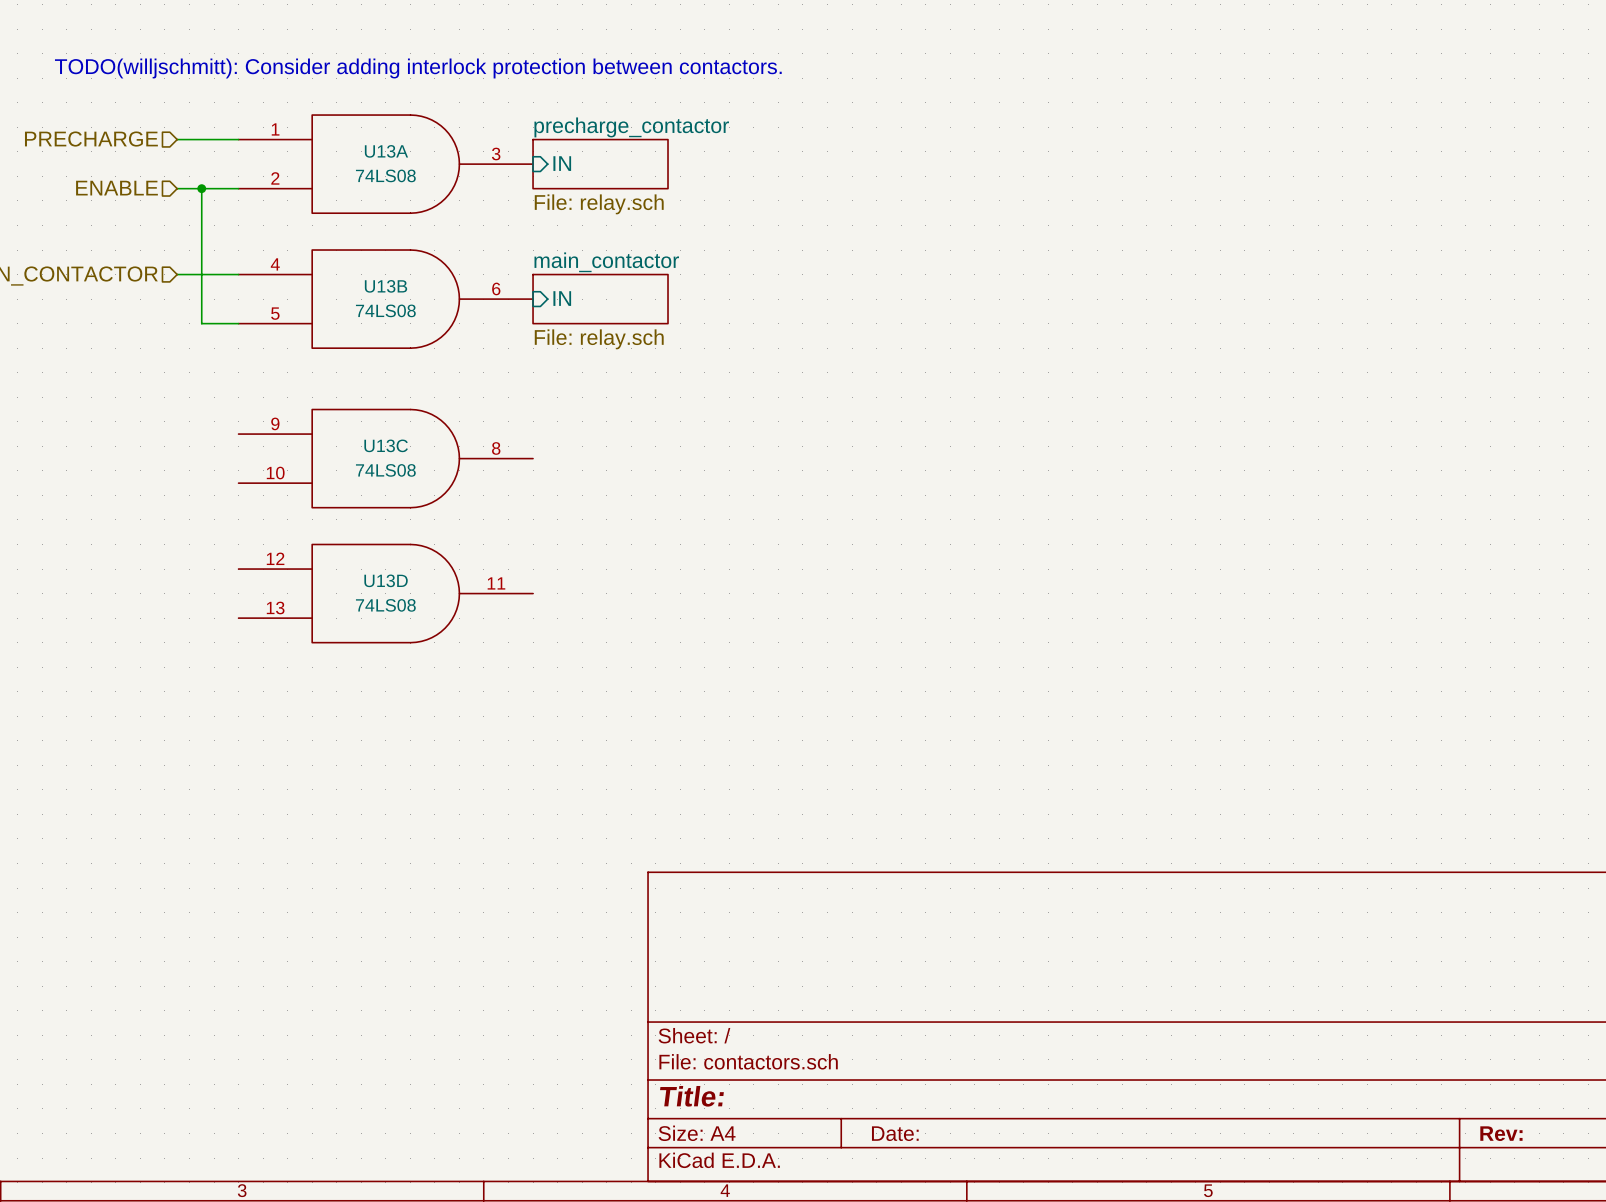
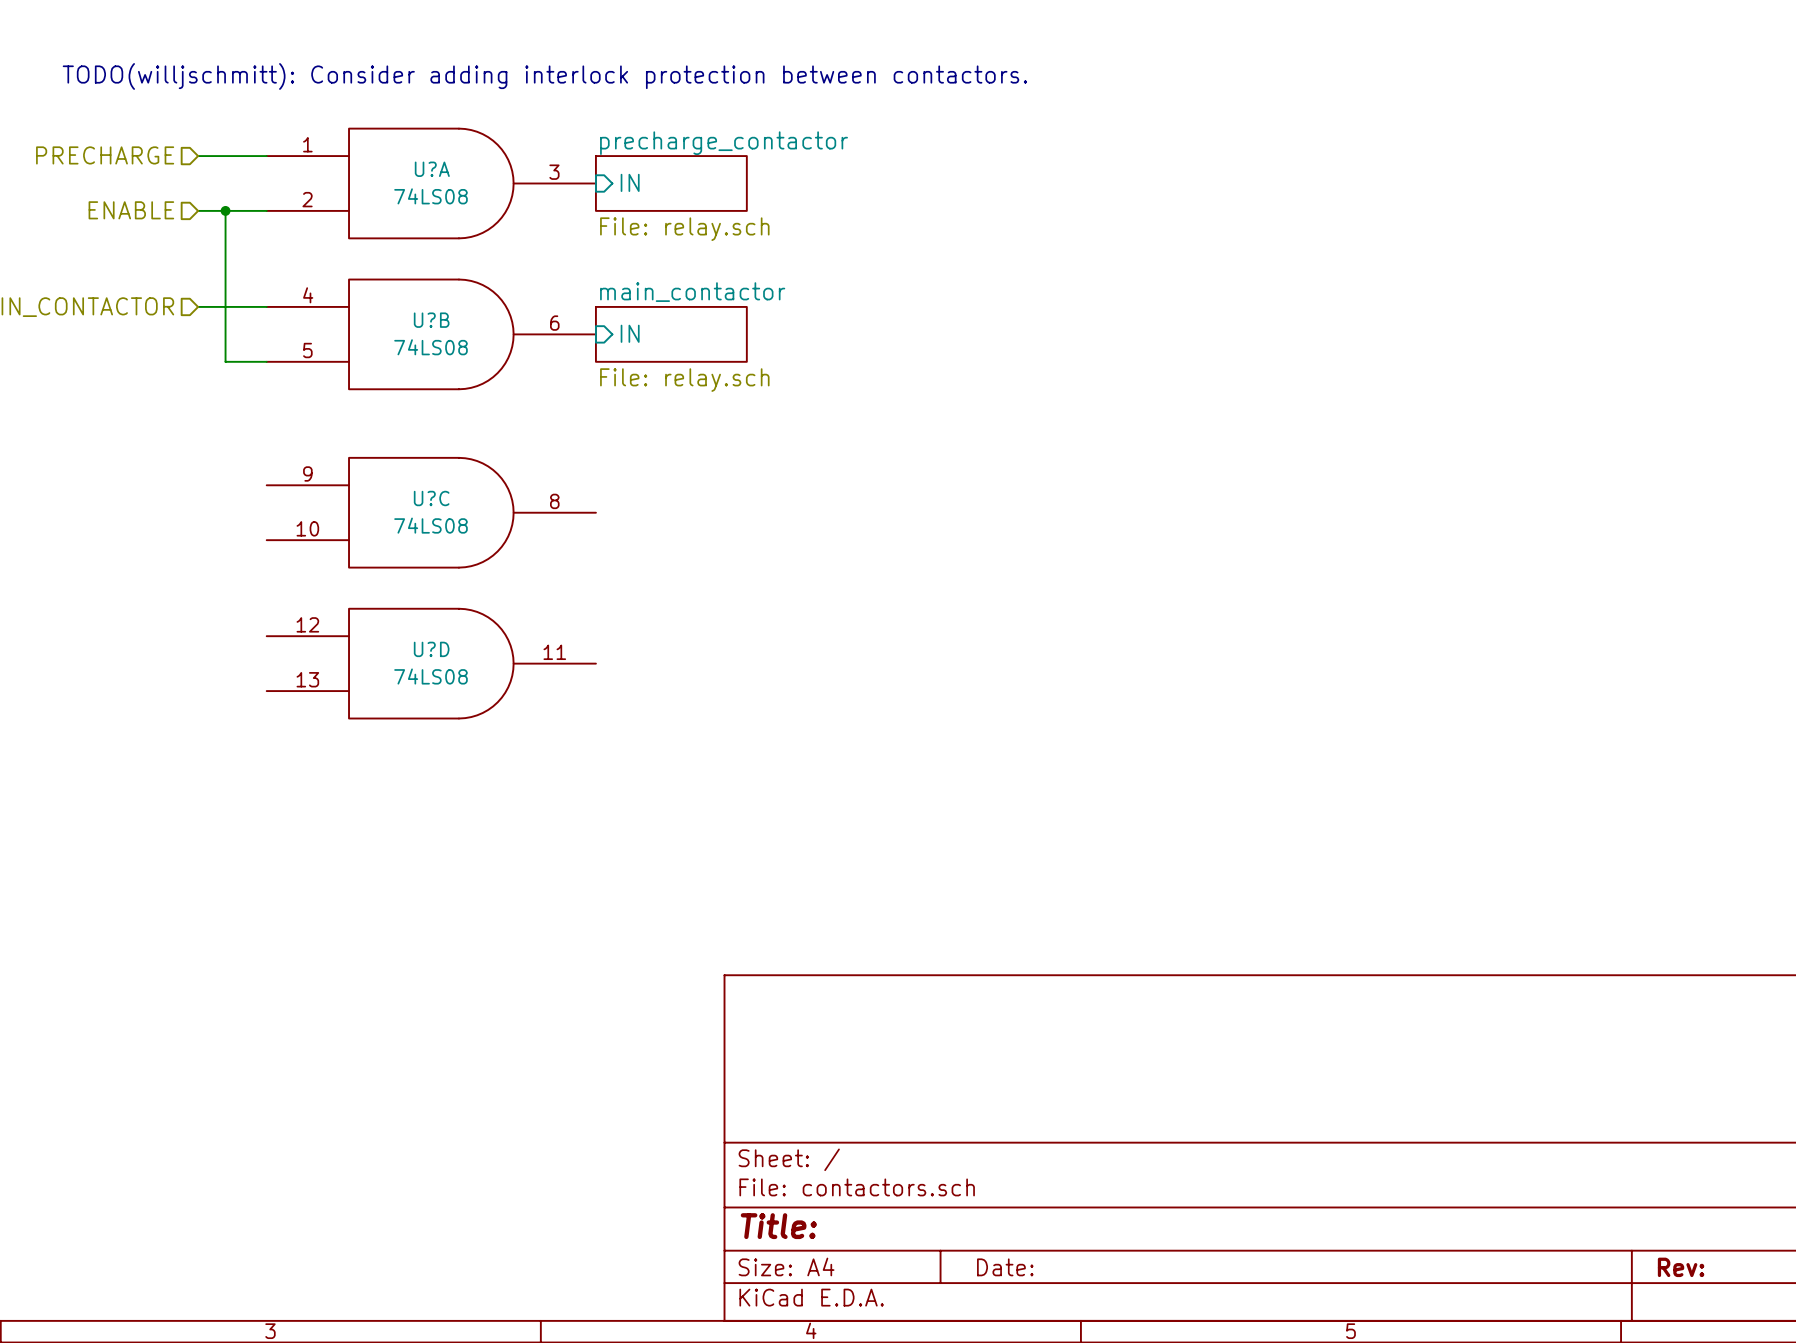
U13A name: U13A (386, 151) -> U?A (432, 169)
U13B name: U13B (386, 286) -> U?B (431, 320)
U13C name: U13C (386, 445) -> U?C (431, 498)
U13D name: U13D (386, 580) -> U?D (431, 649)

